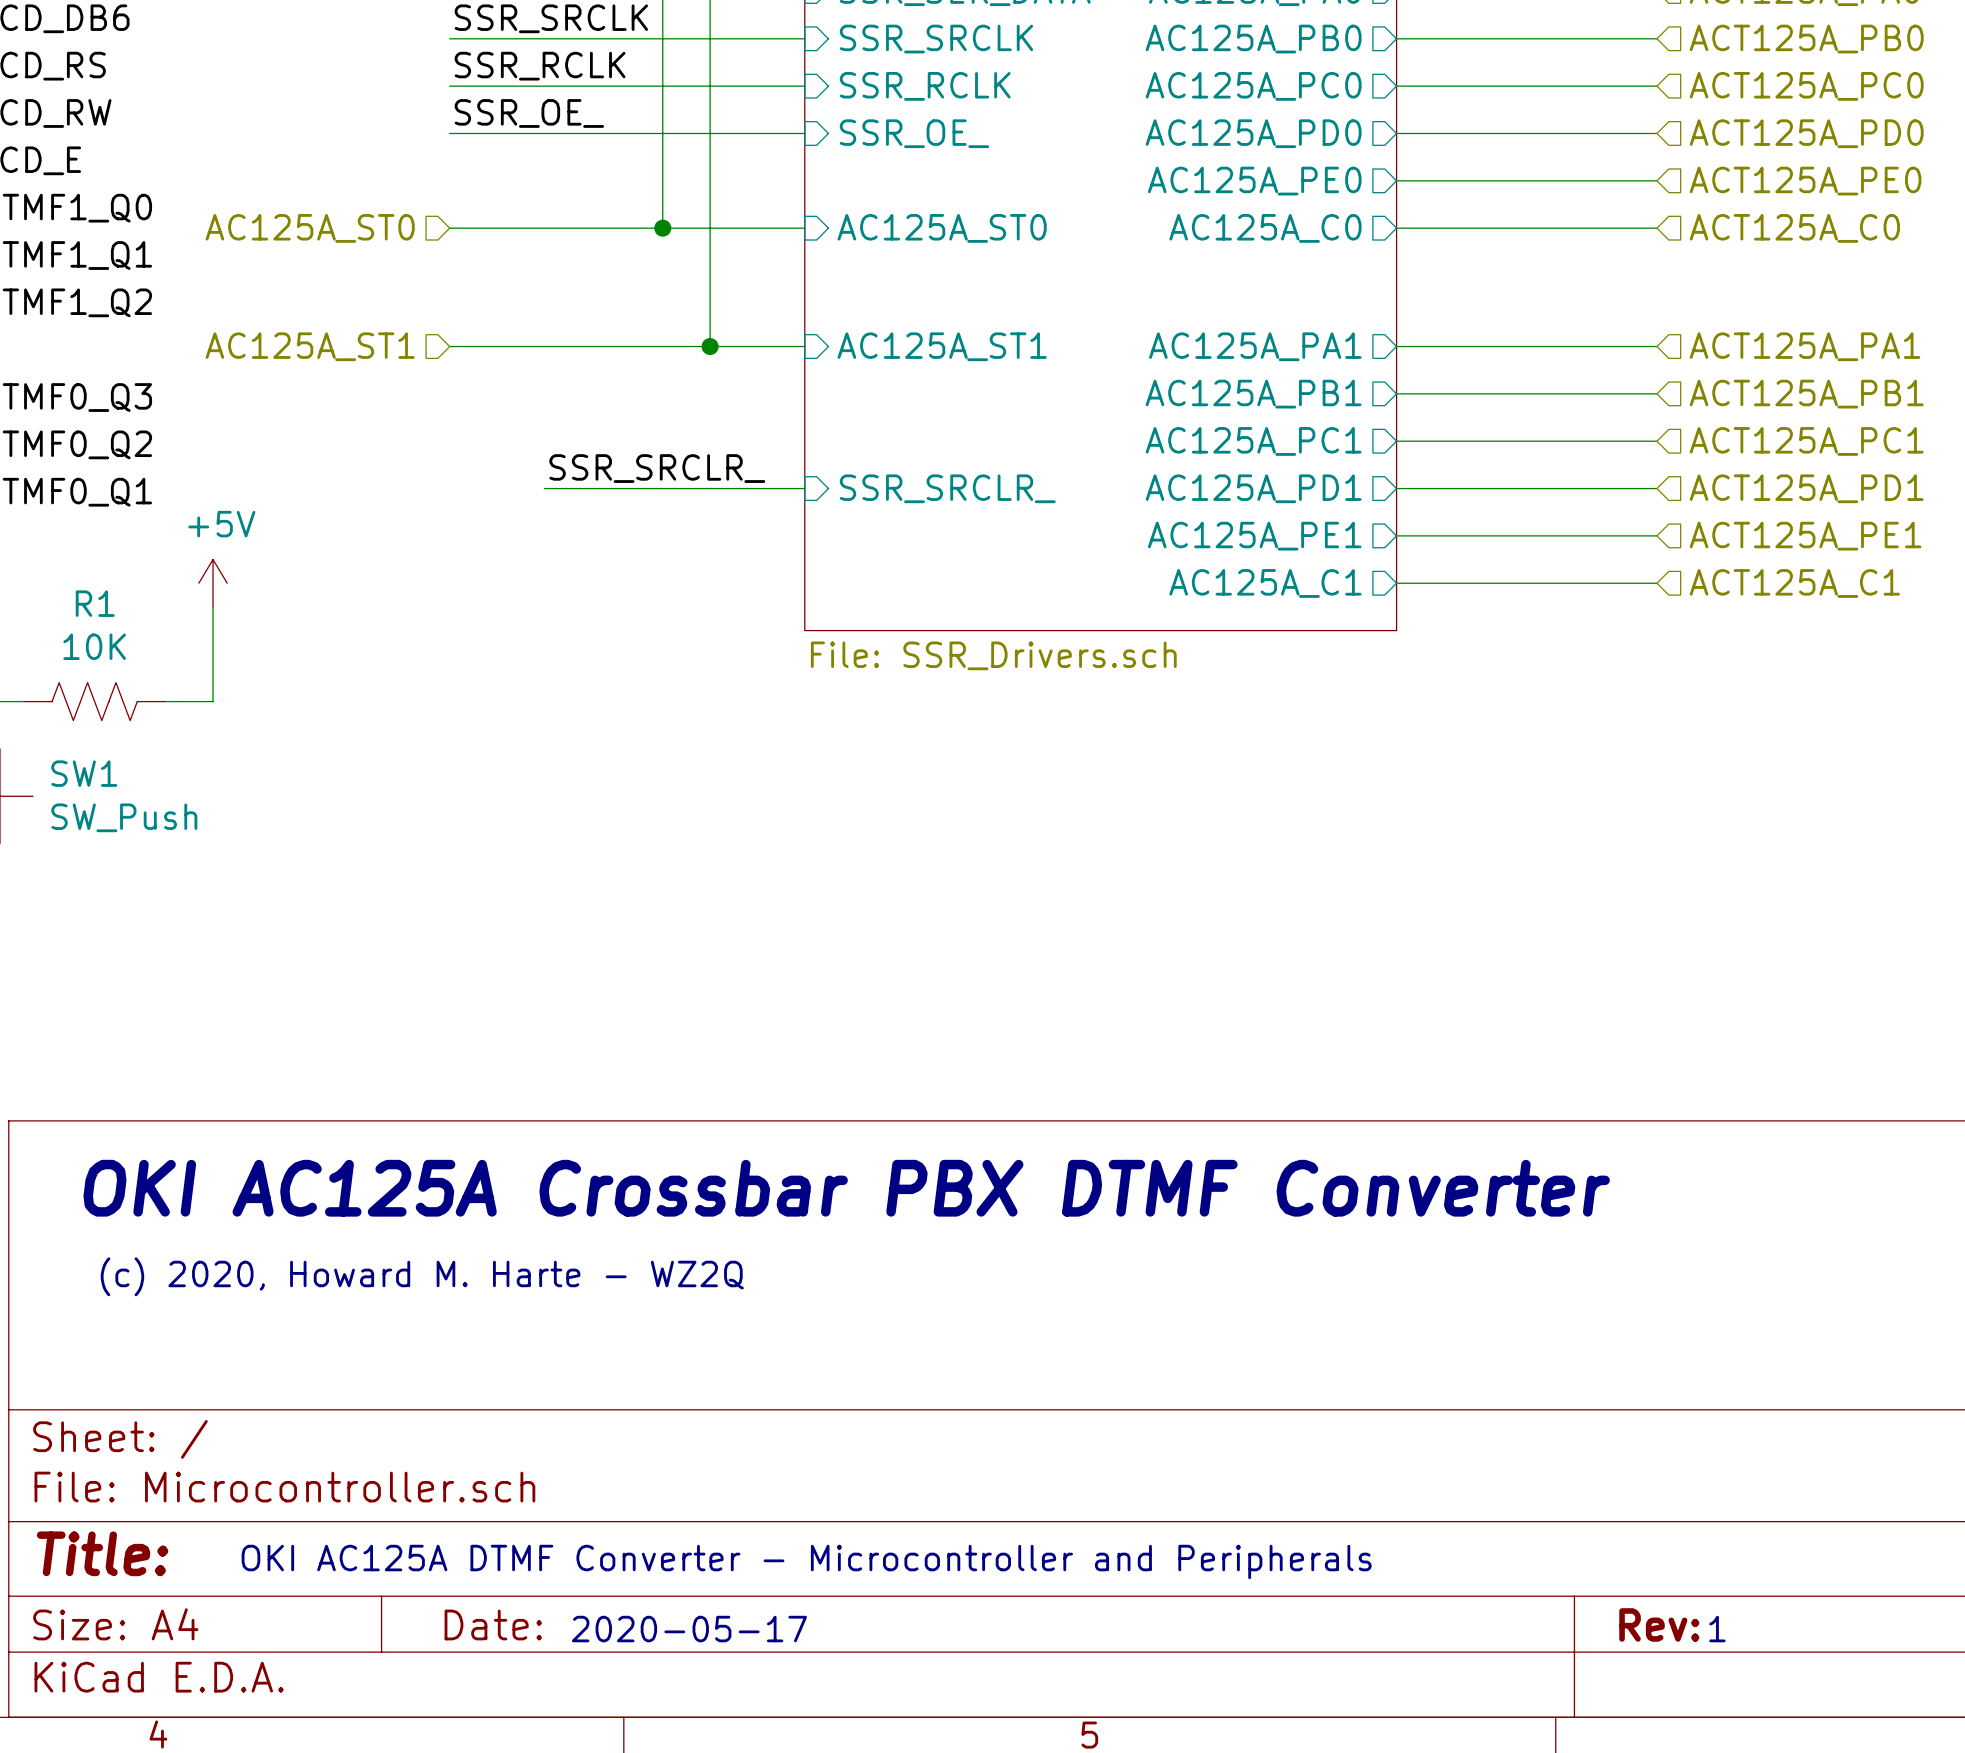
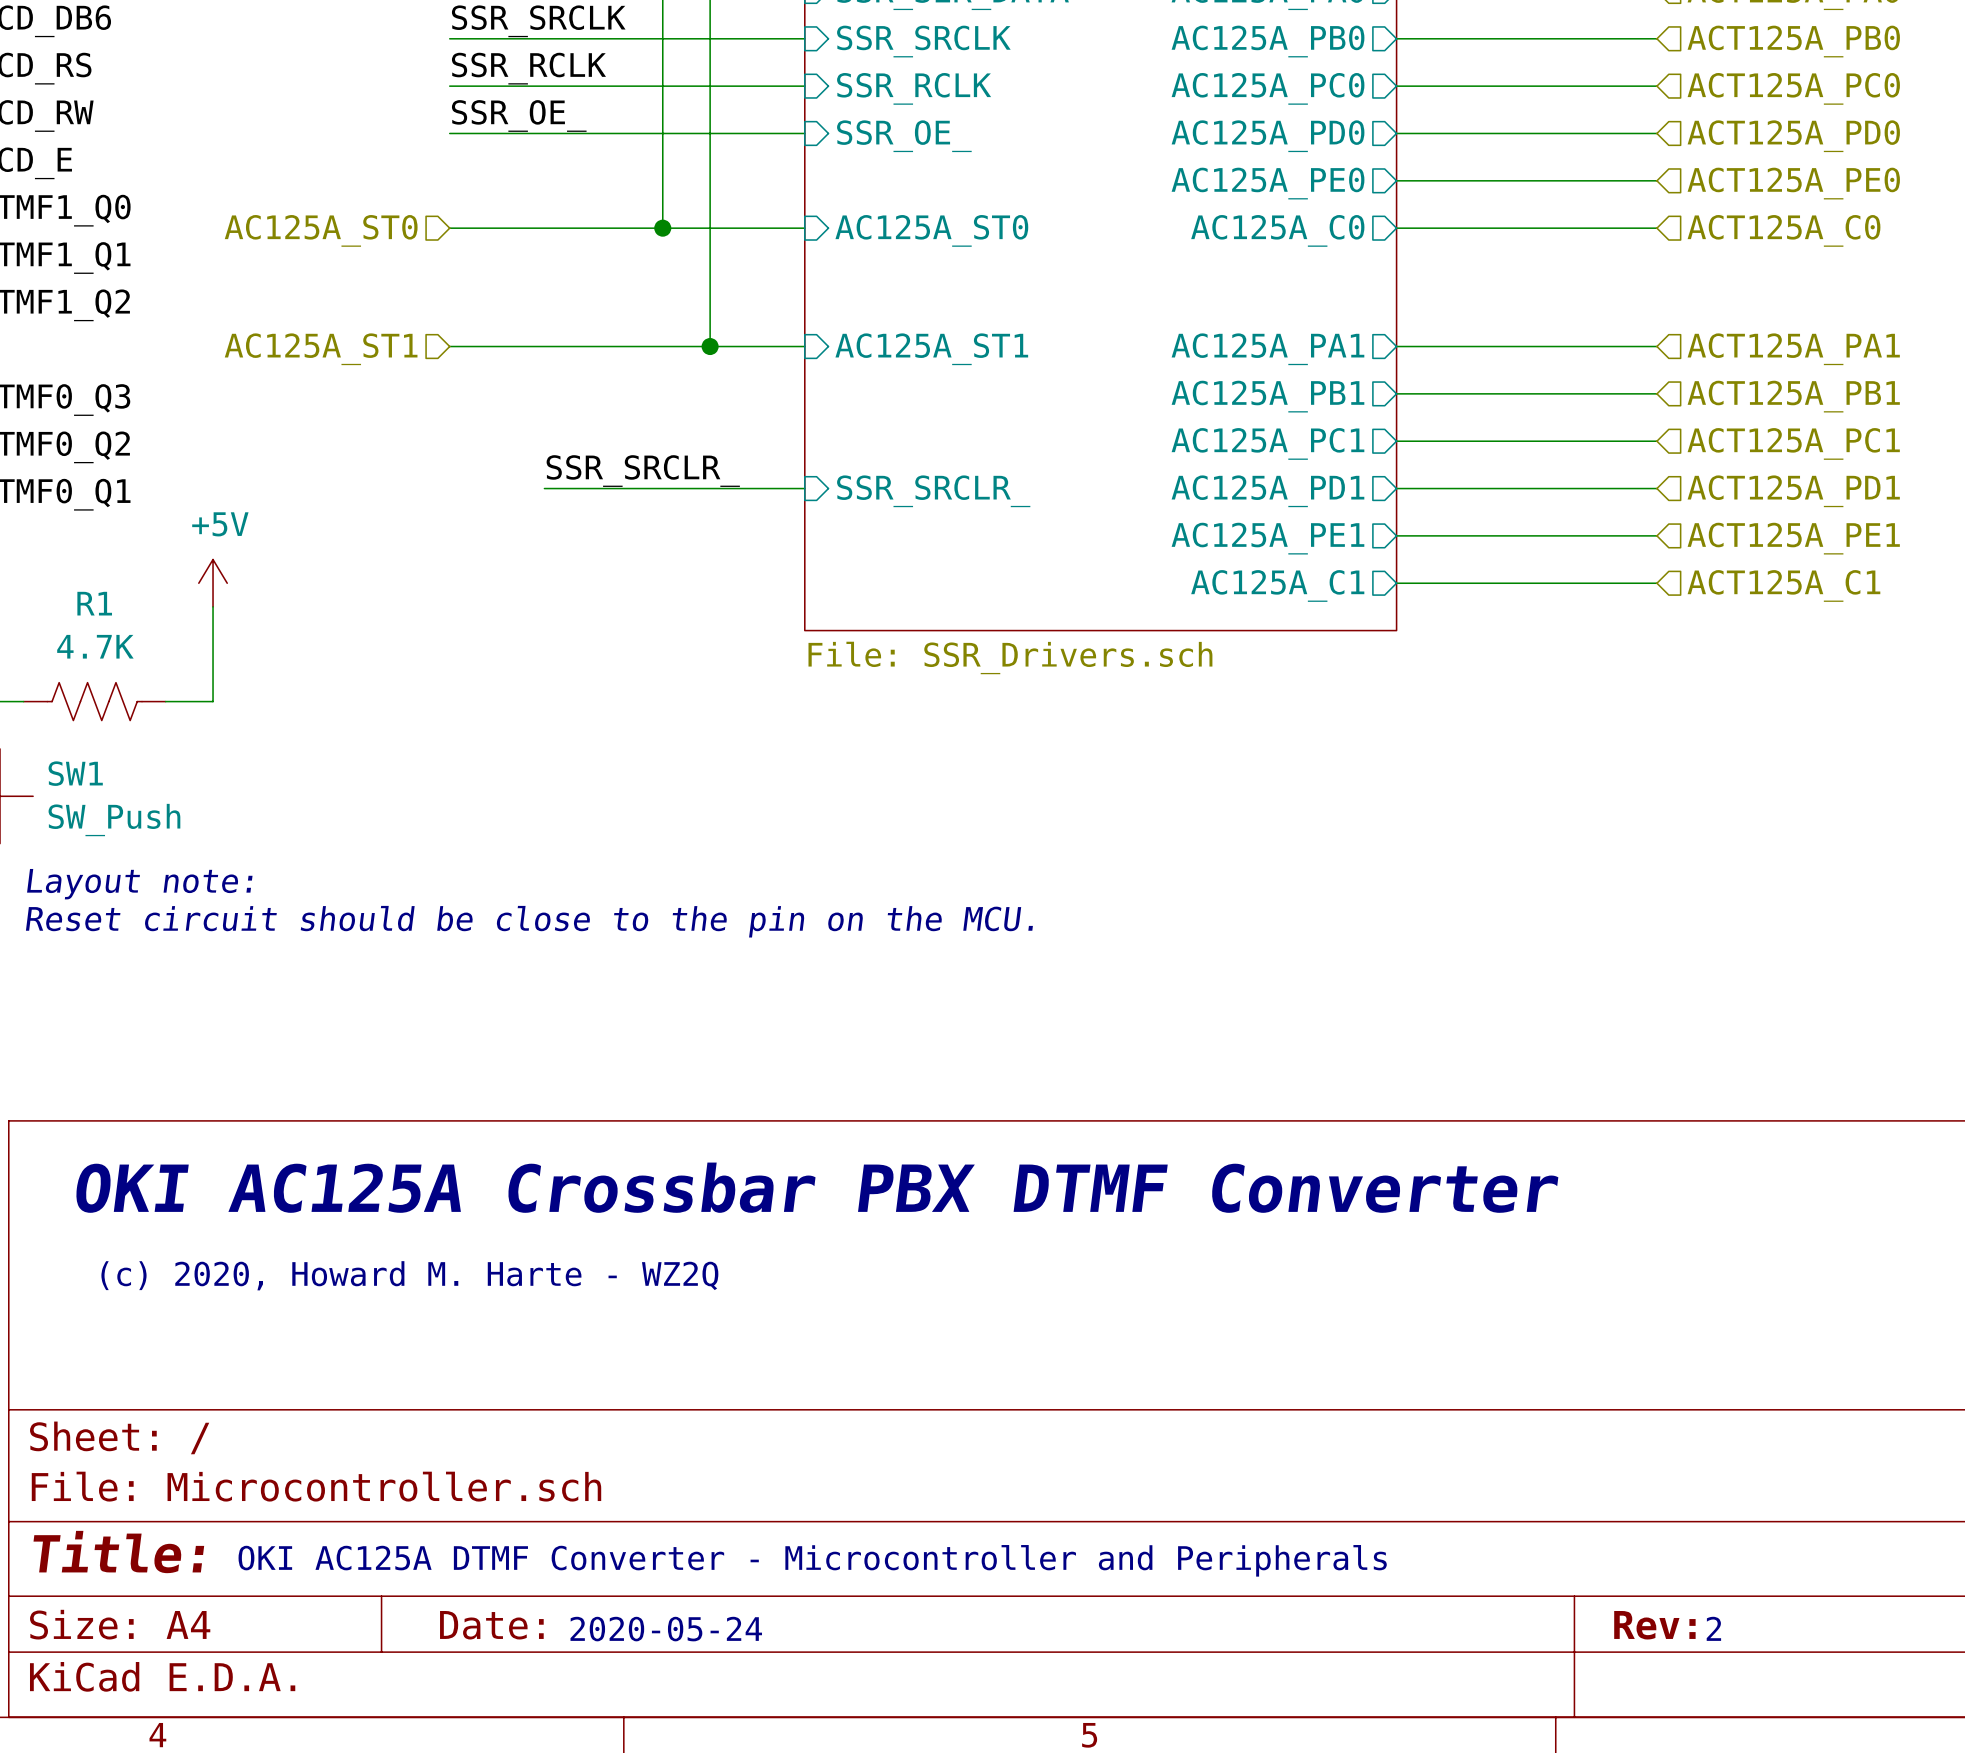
R1 value: 10K (94, 646) -> 4.7K (95, 646)
text: none -> Layout note: (139, 884)
text: none -> Reset circuit should be close to the pin on the MCU. (529, 921)
text: 2020-05-17 (689, 1629) -> 2020-05-24 (666, 1629)
text: 1 (1717, 1629) -> 2 (1713, 1628)

